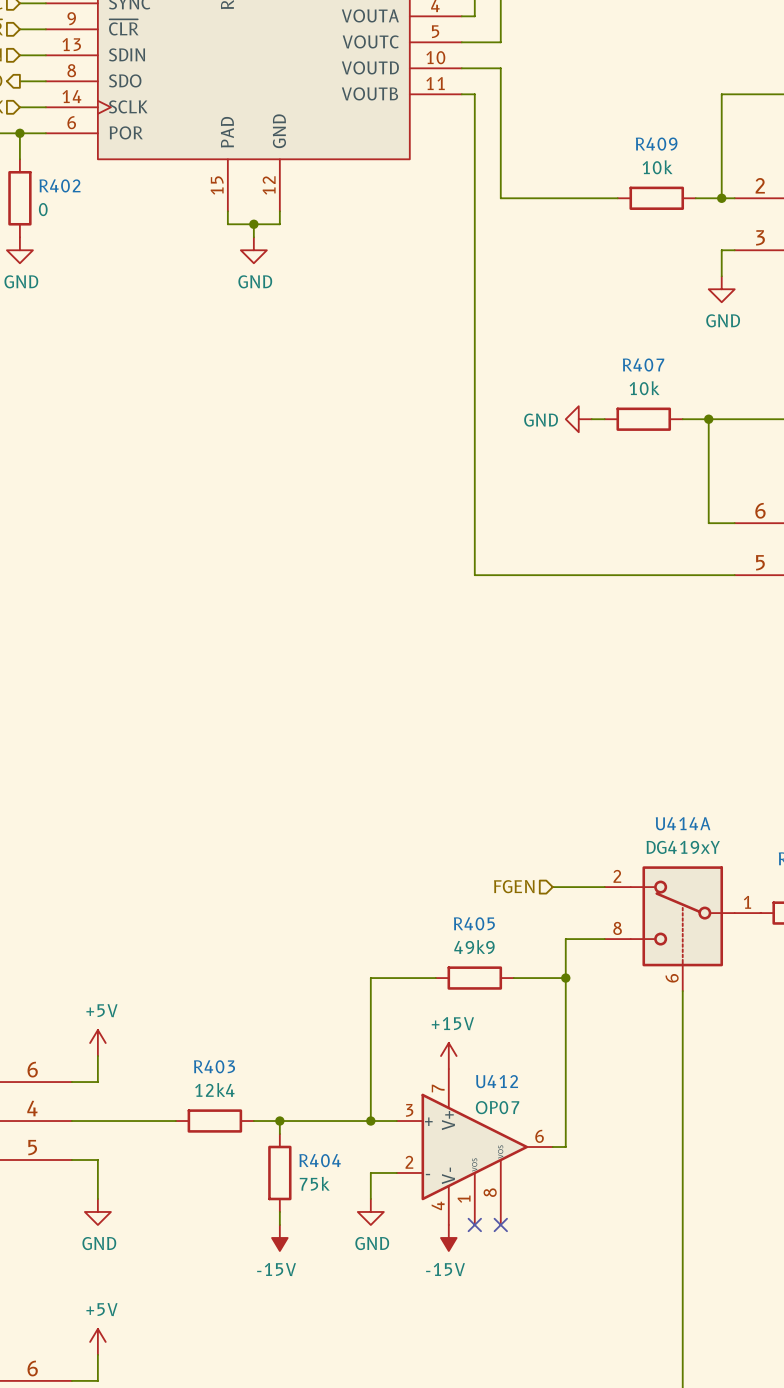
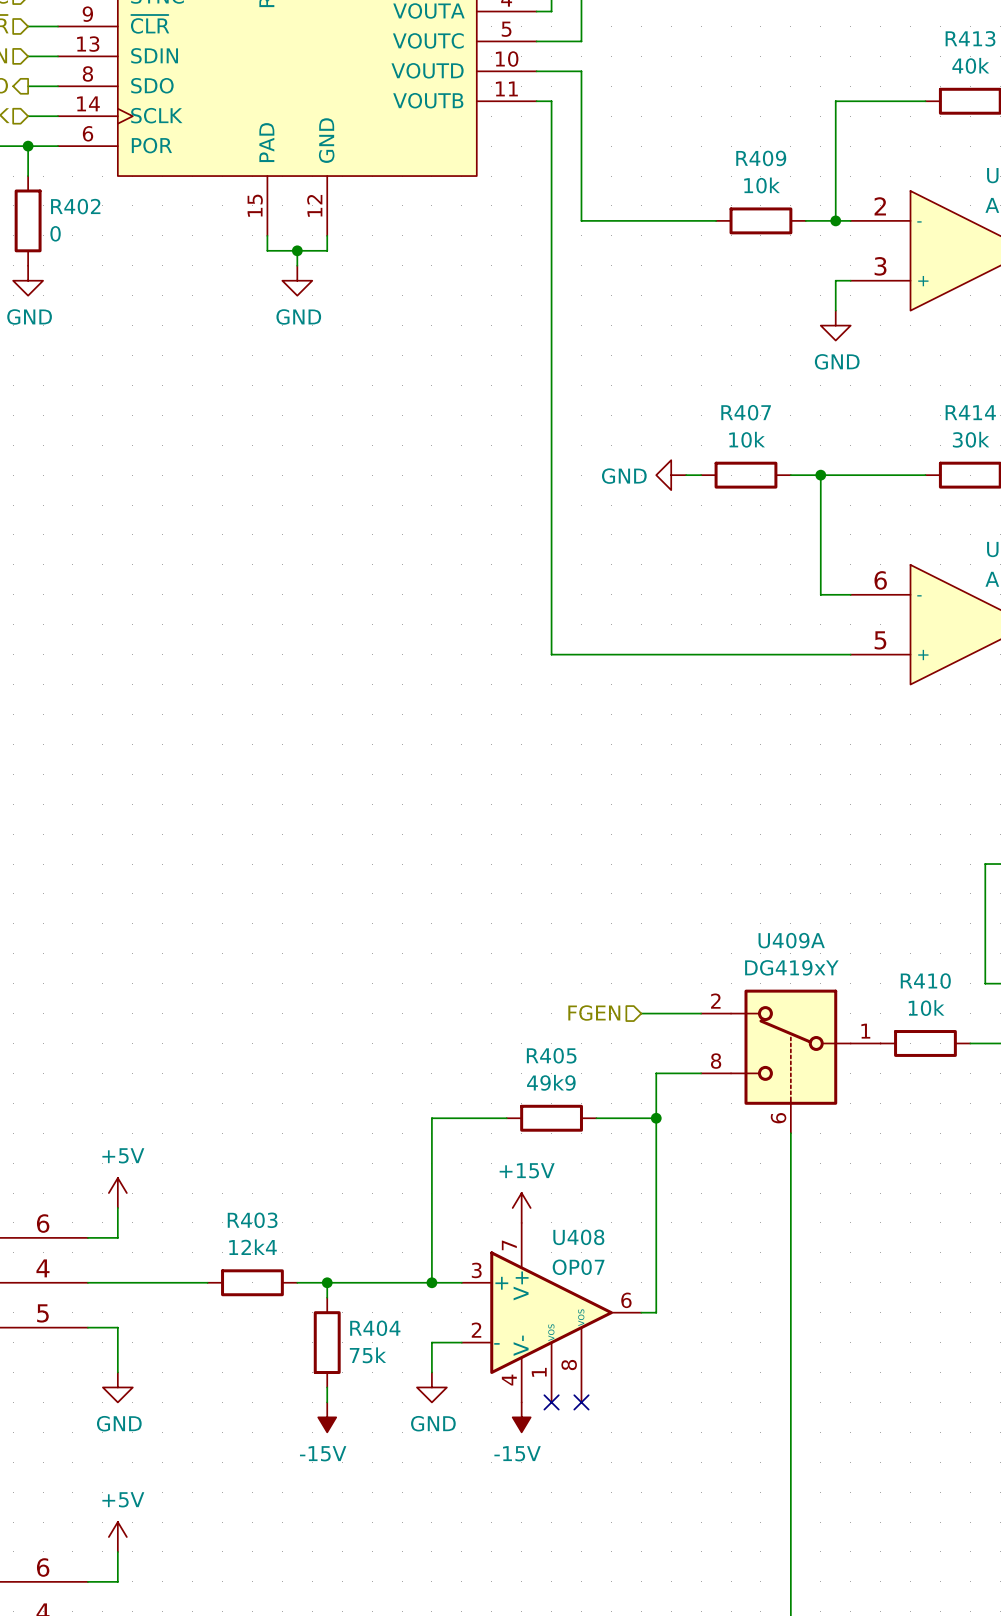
U414A name: U414A (683, 823) -> U409A (791, 940)
U412 name: U412 (497, 1081) -> U408 (578, 1237)

